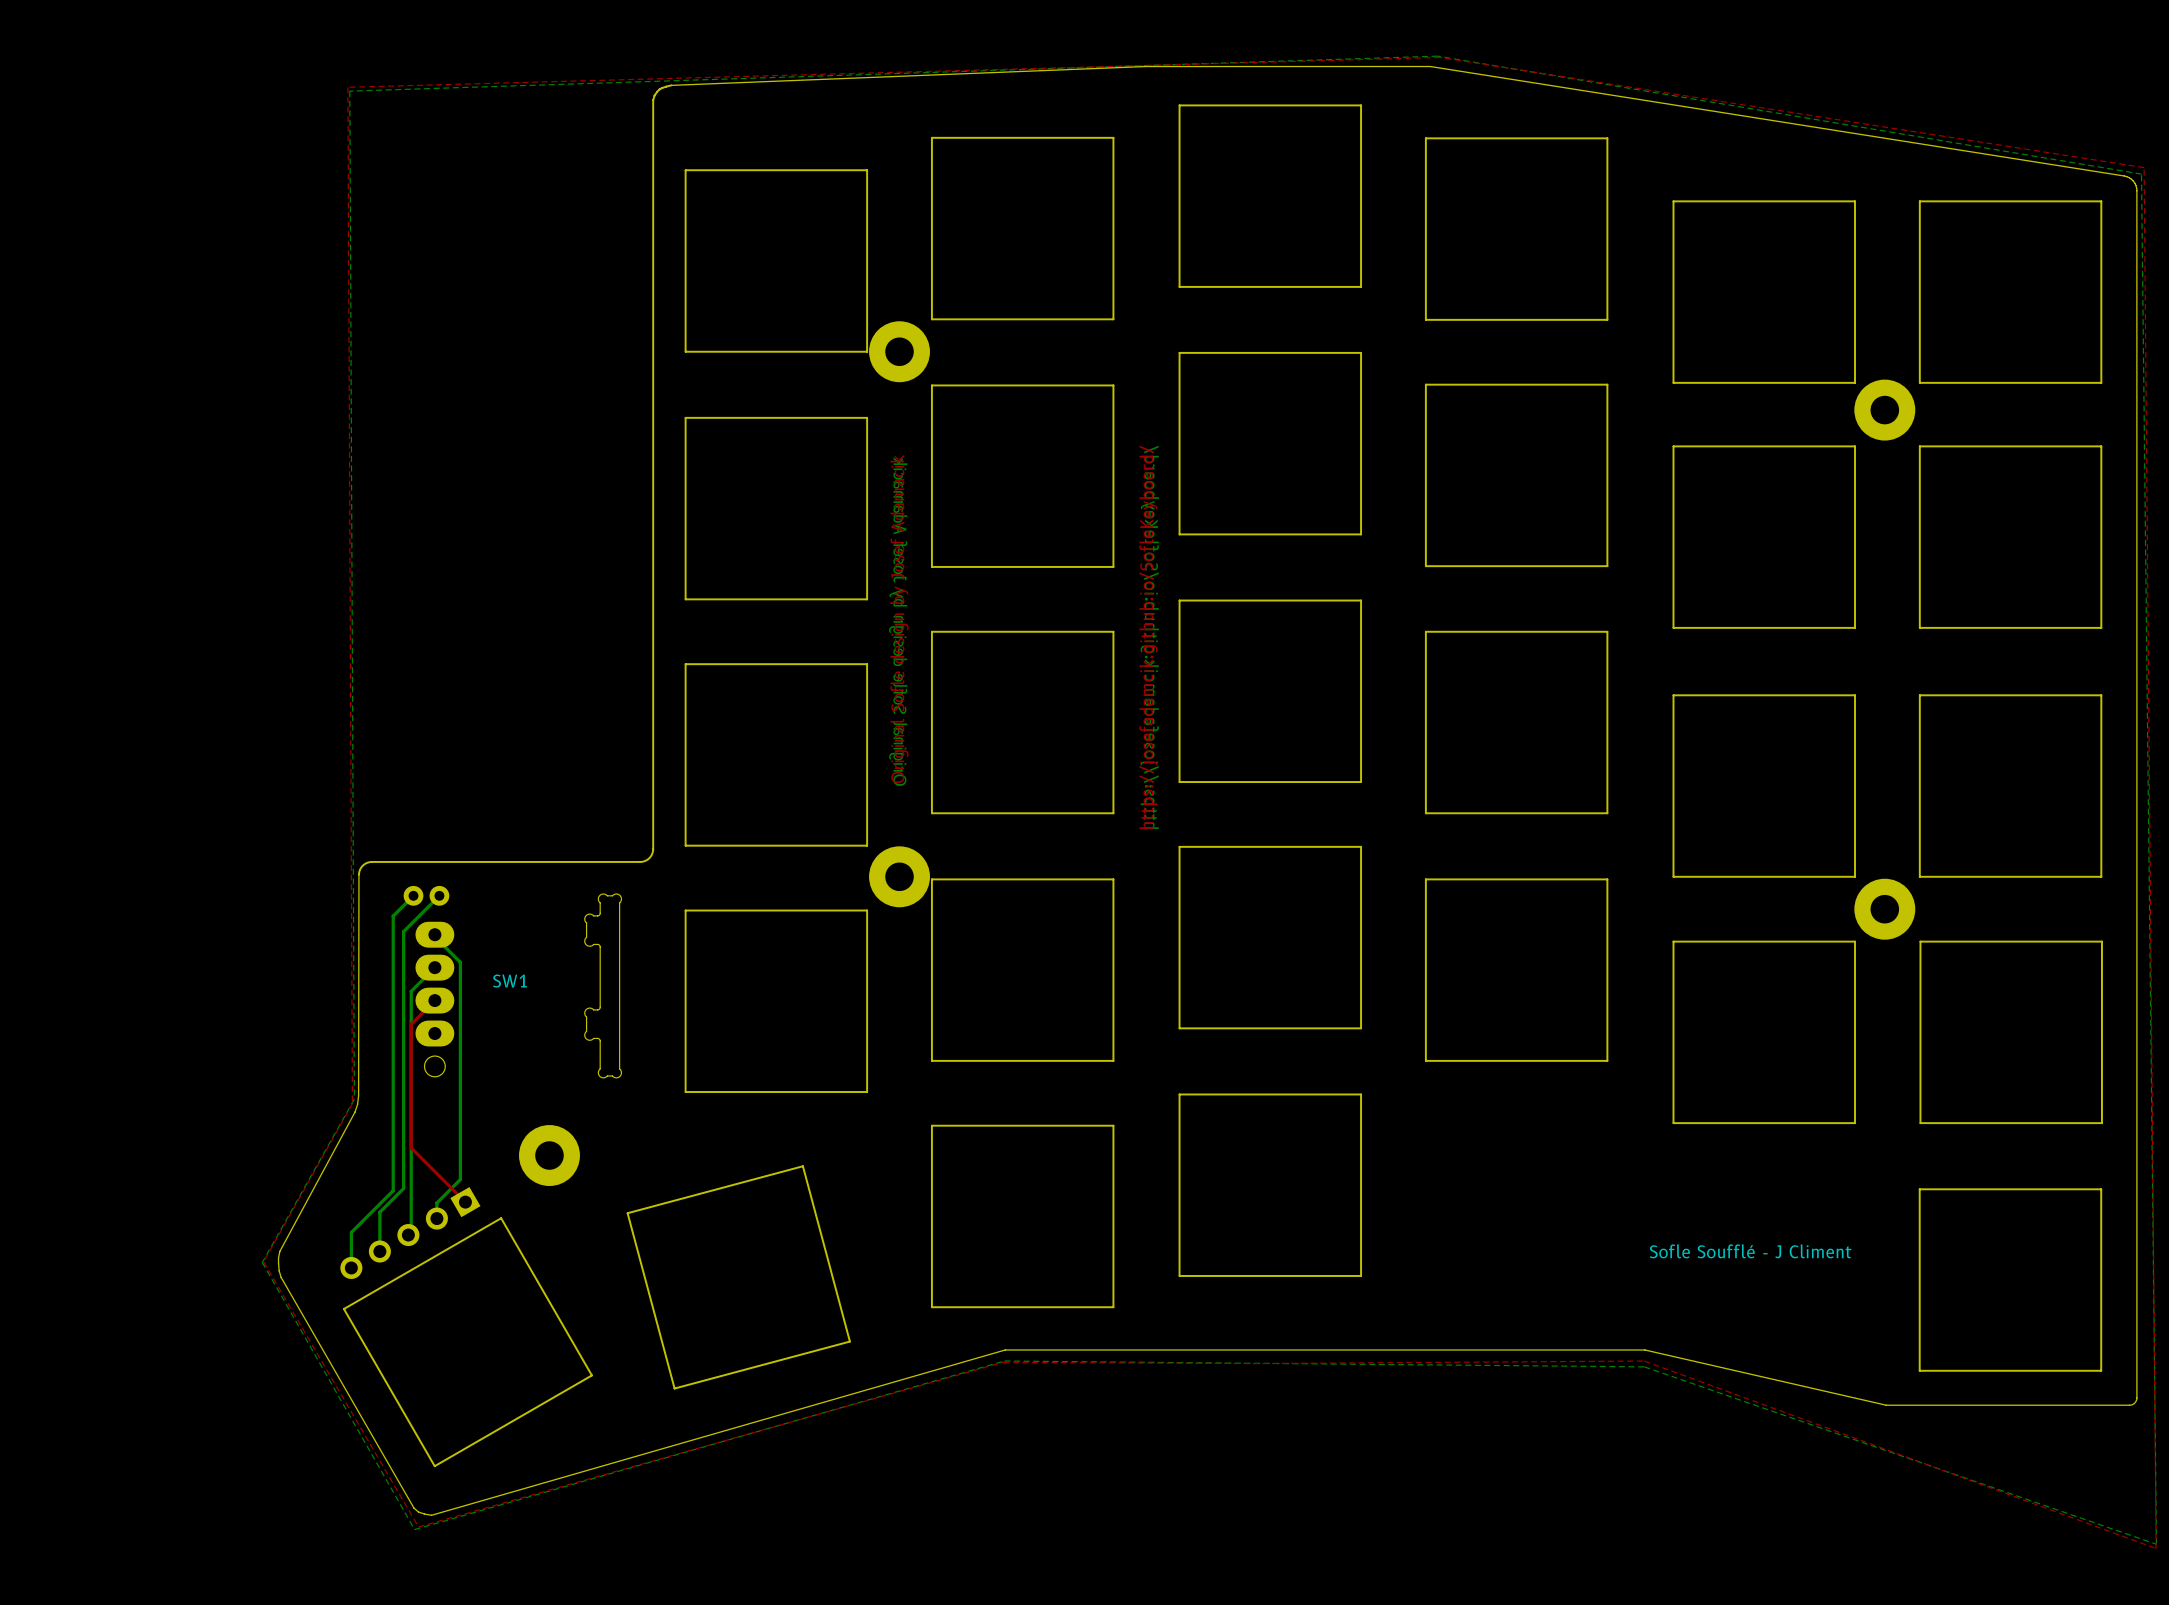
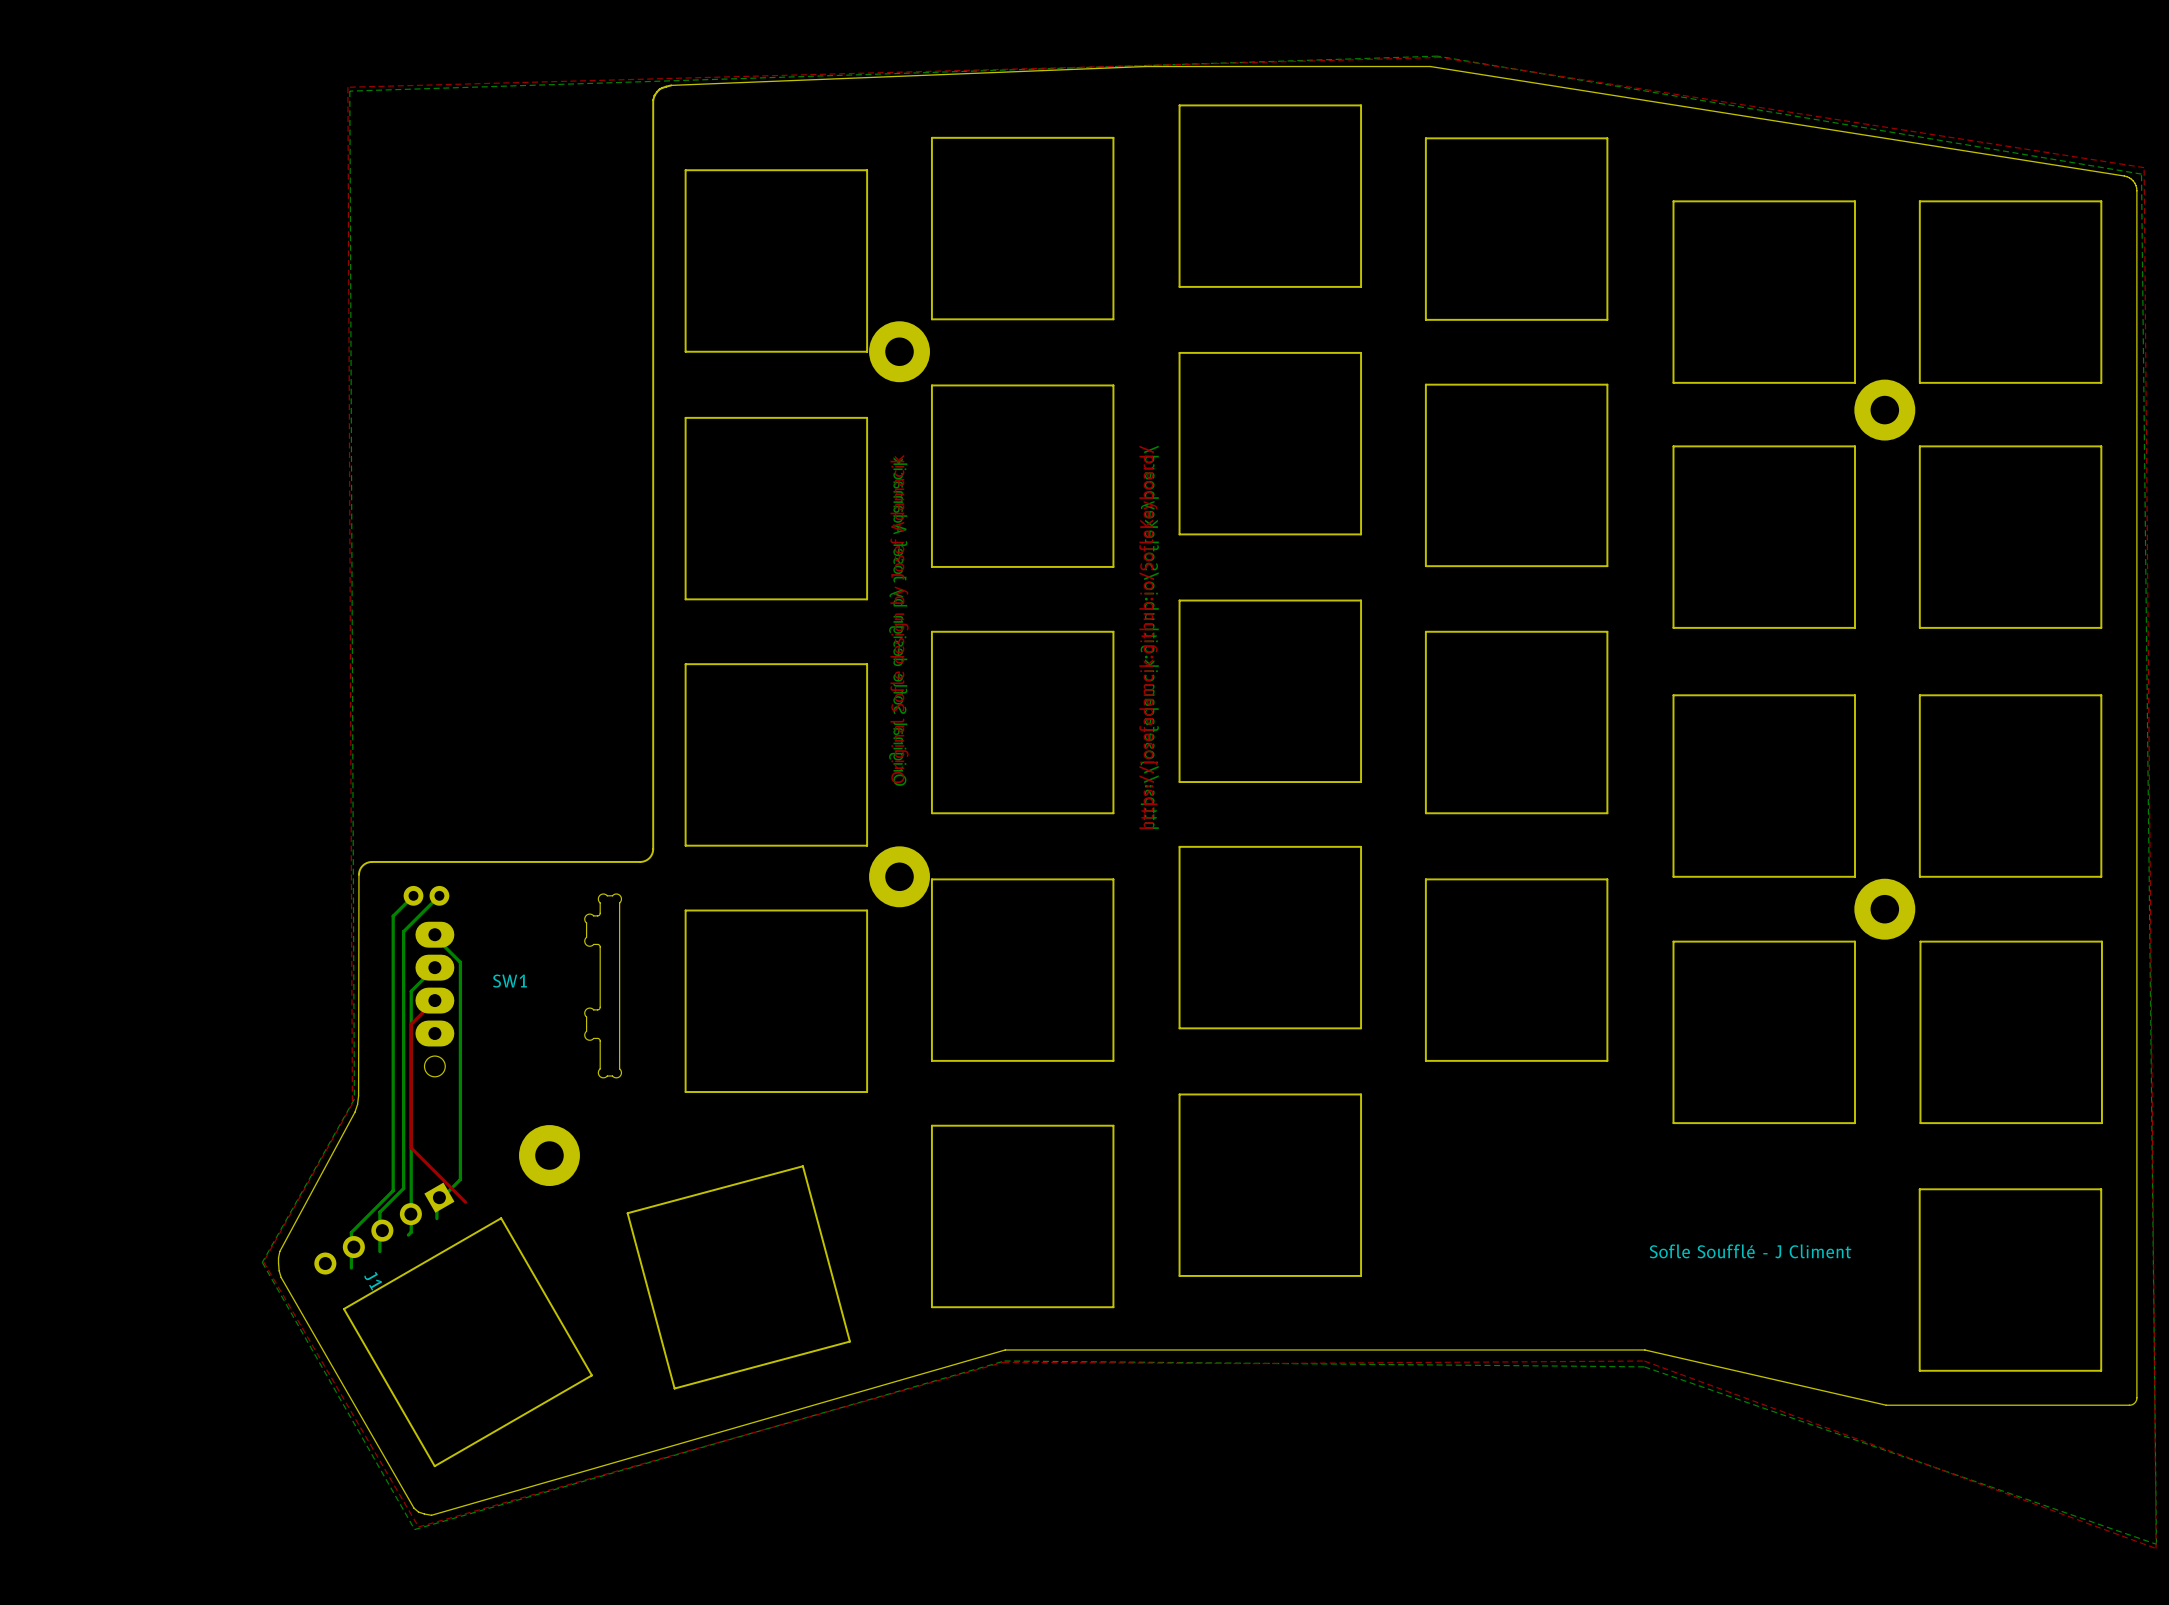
J1: none -> (384, 1228)
part: (410, 1233) -> none

